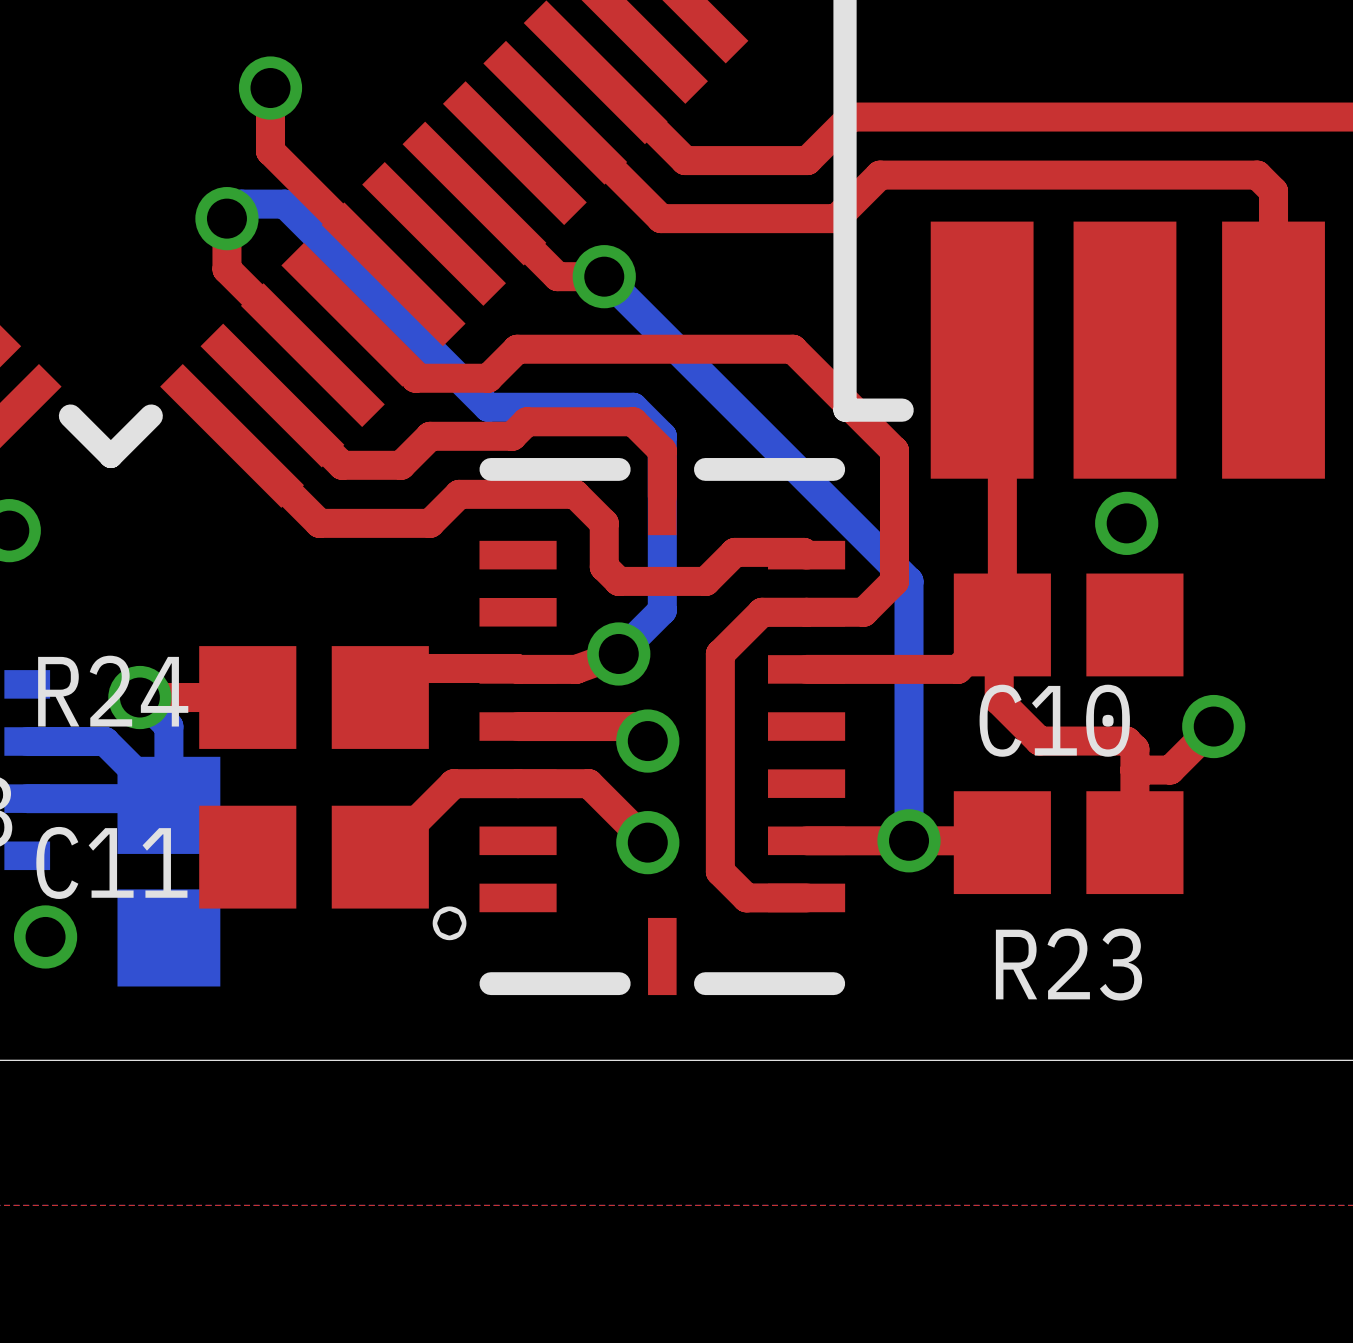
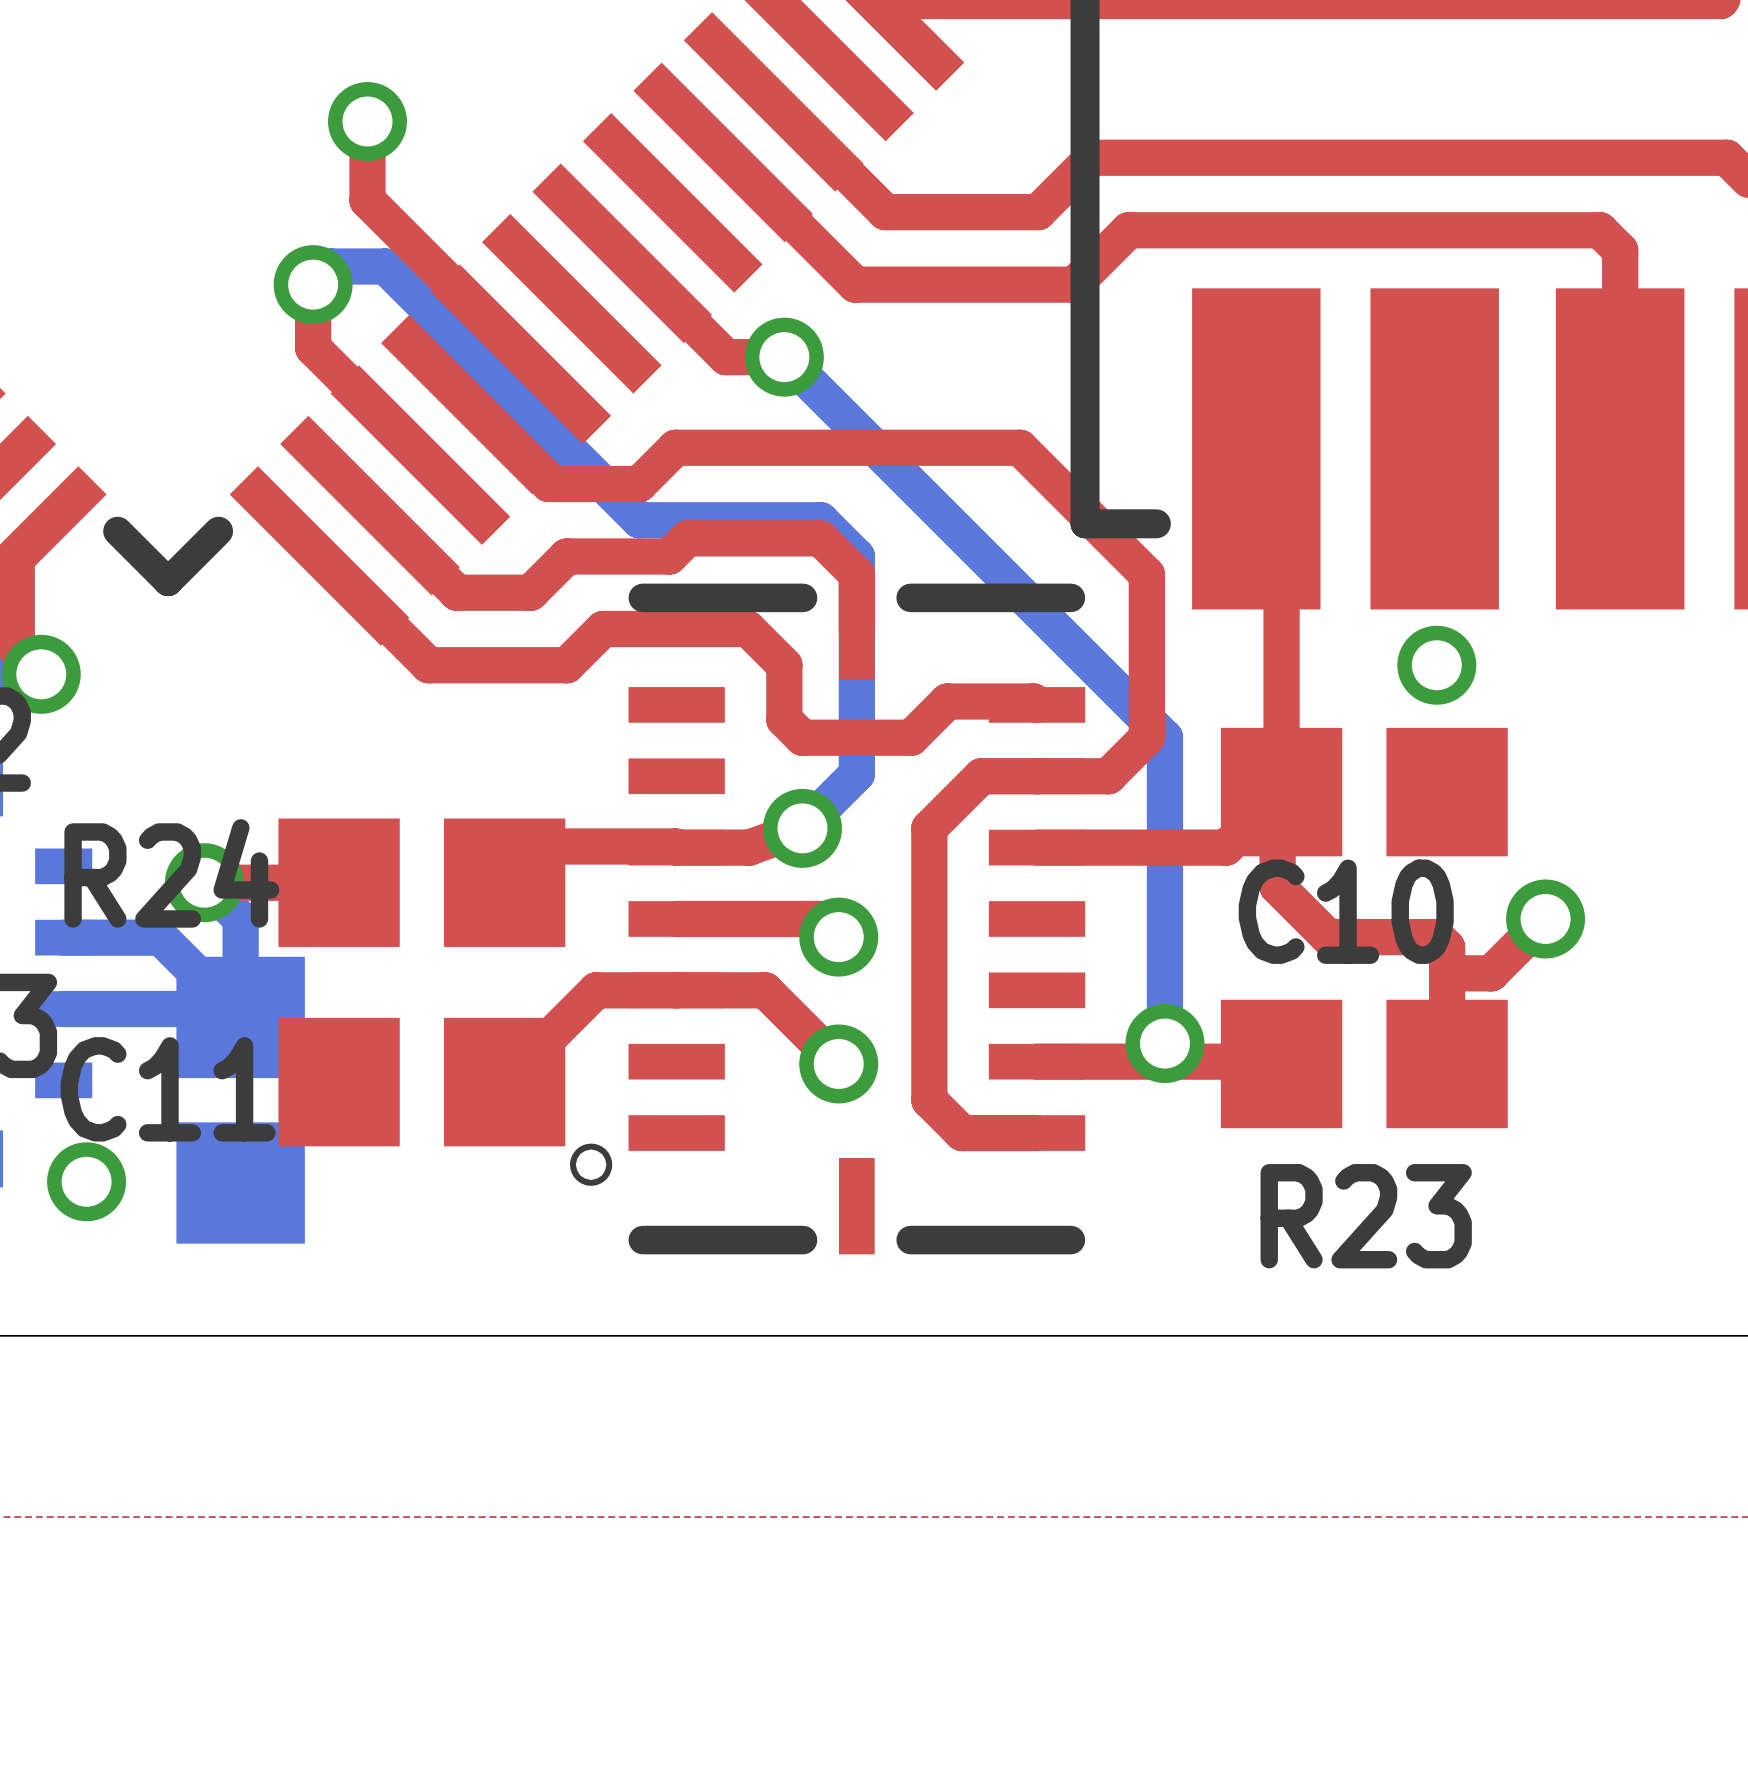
via position: (909, 840) -> (1164, 1043)

